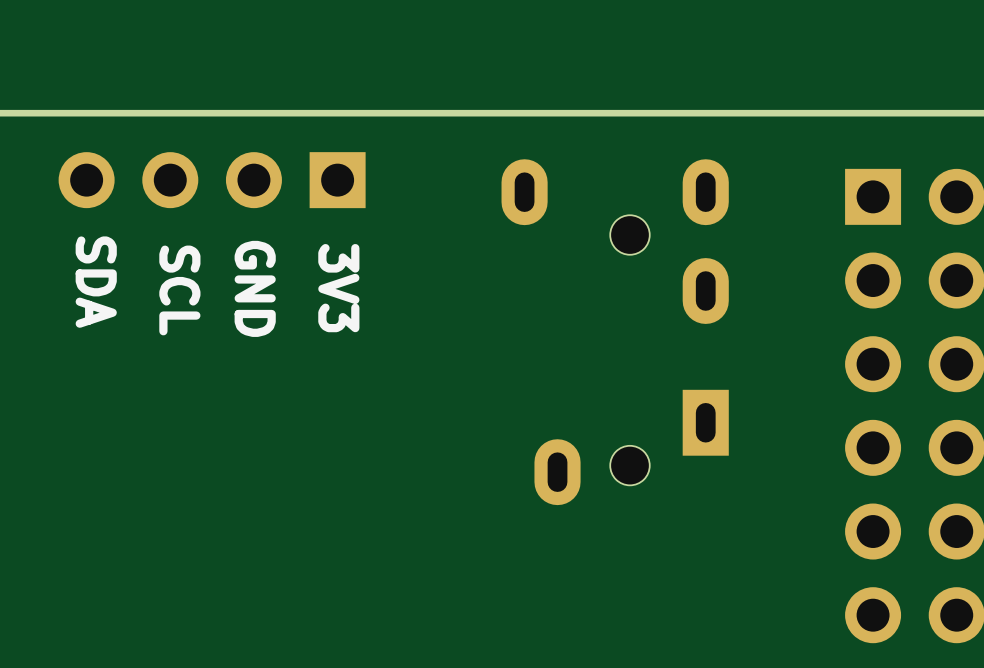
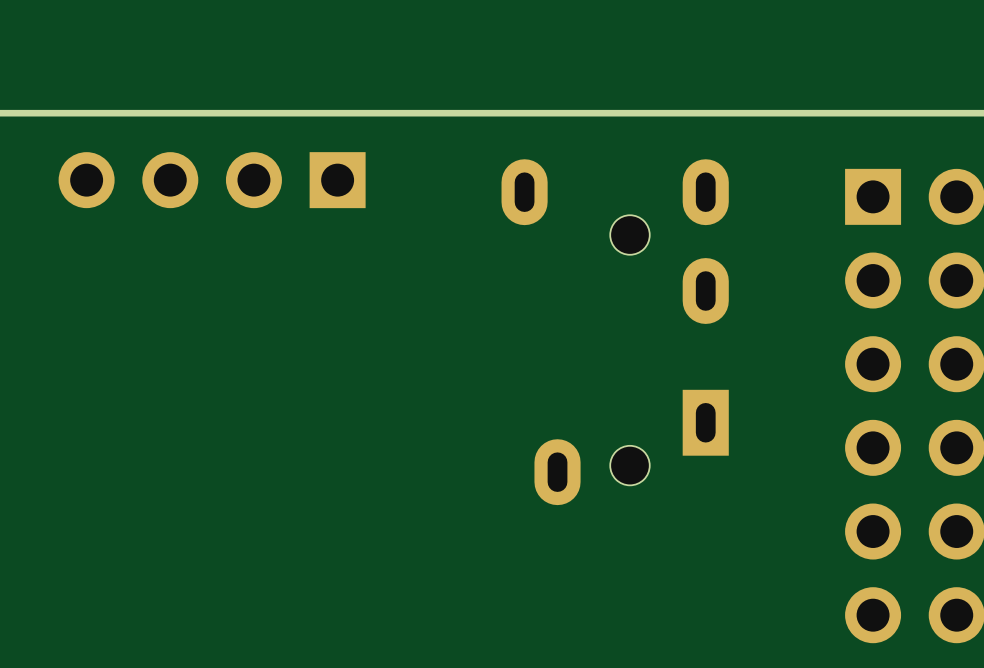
text: SDA (96, 282) -> none
text: GND (255, 288) -> none
text: 3V3 (338, 288) -> none
text: SCL (179, 290) -> none

